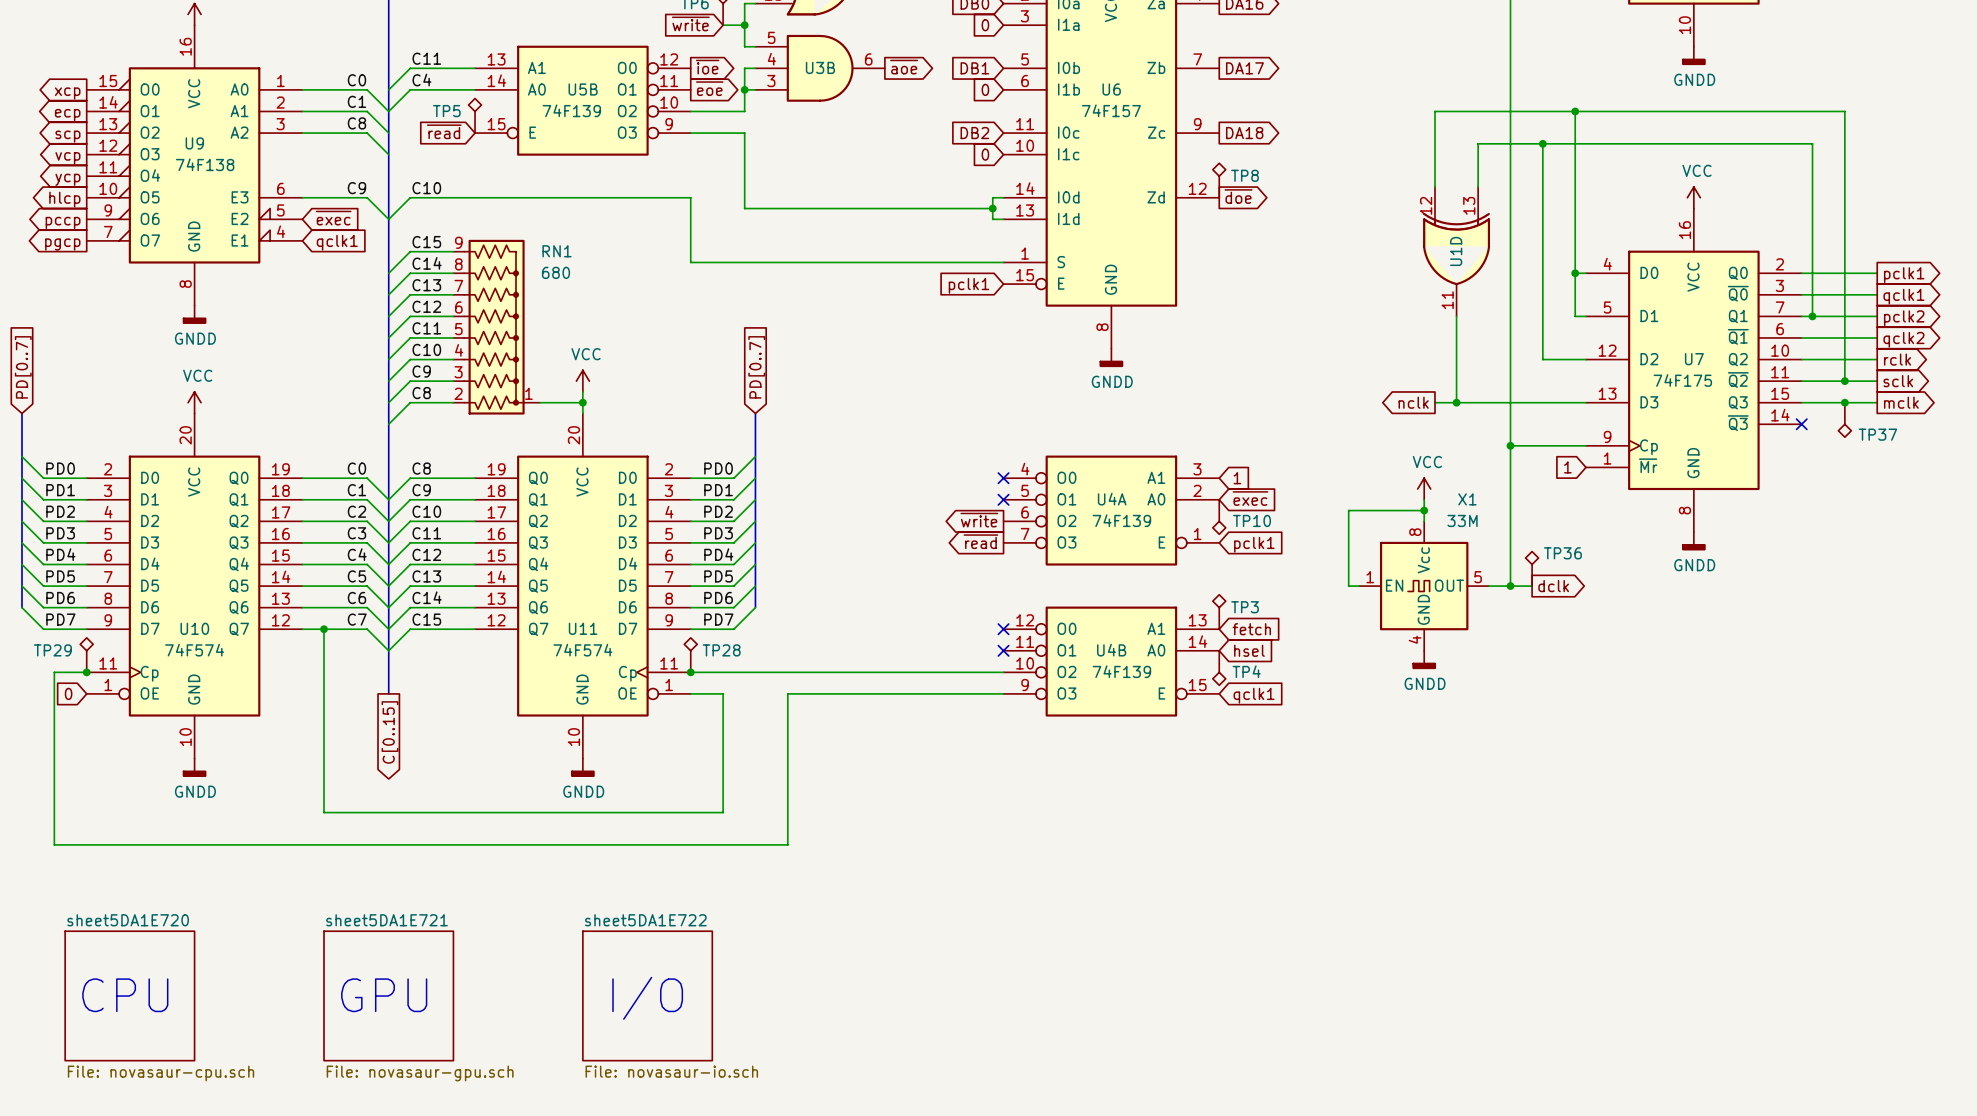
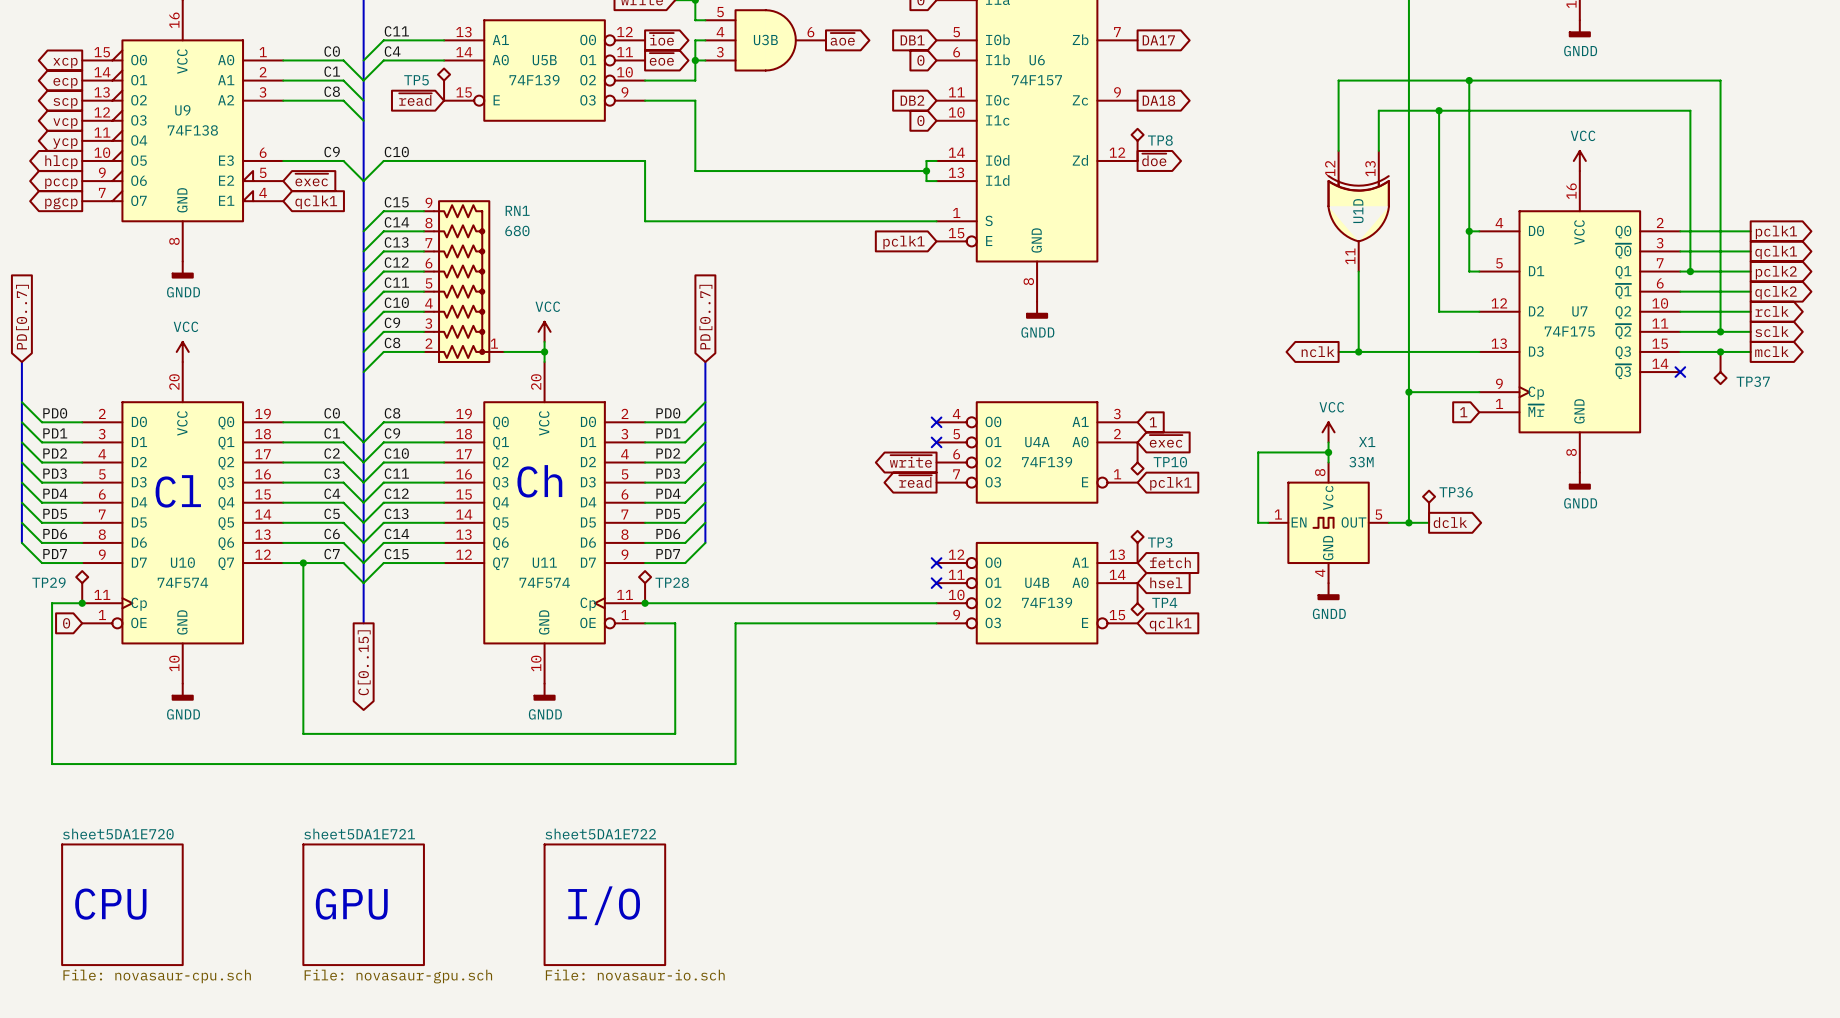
text: none -> Ch (539, 481)
text: none -> Cl (178, 491)

